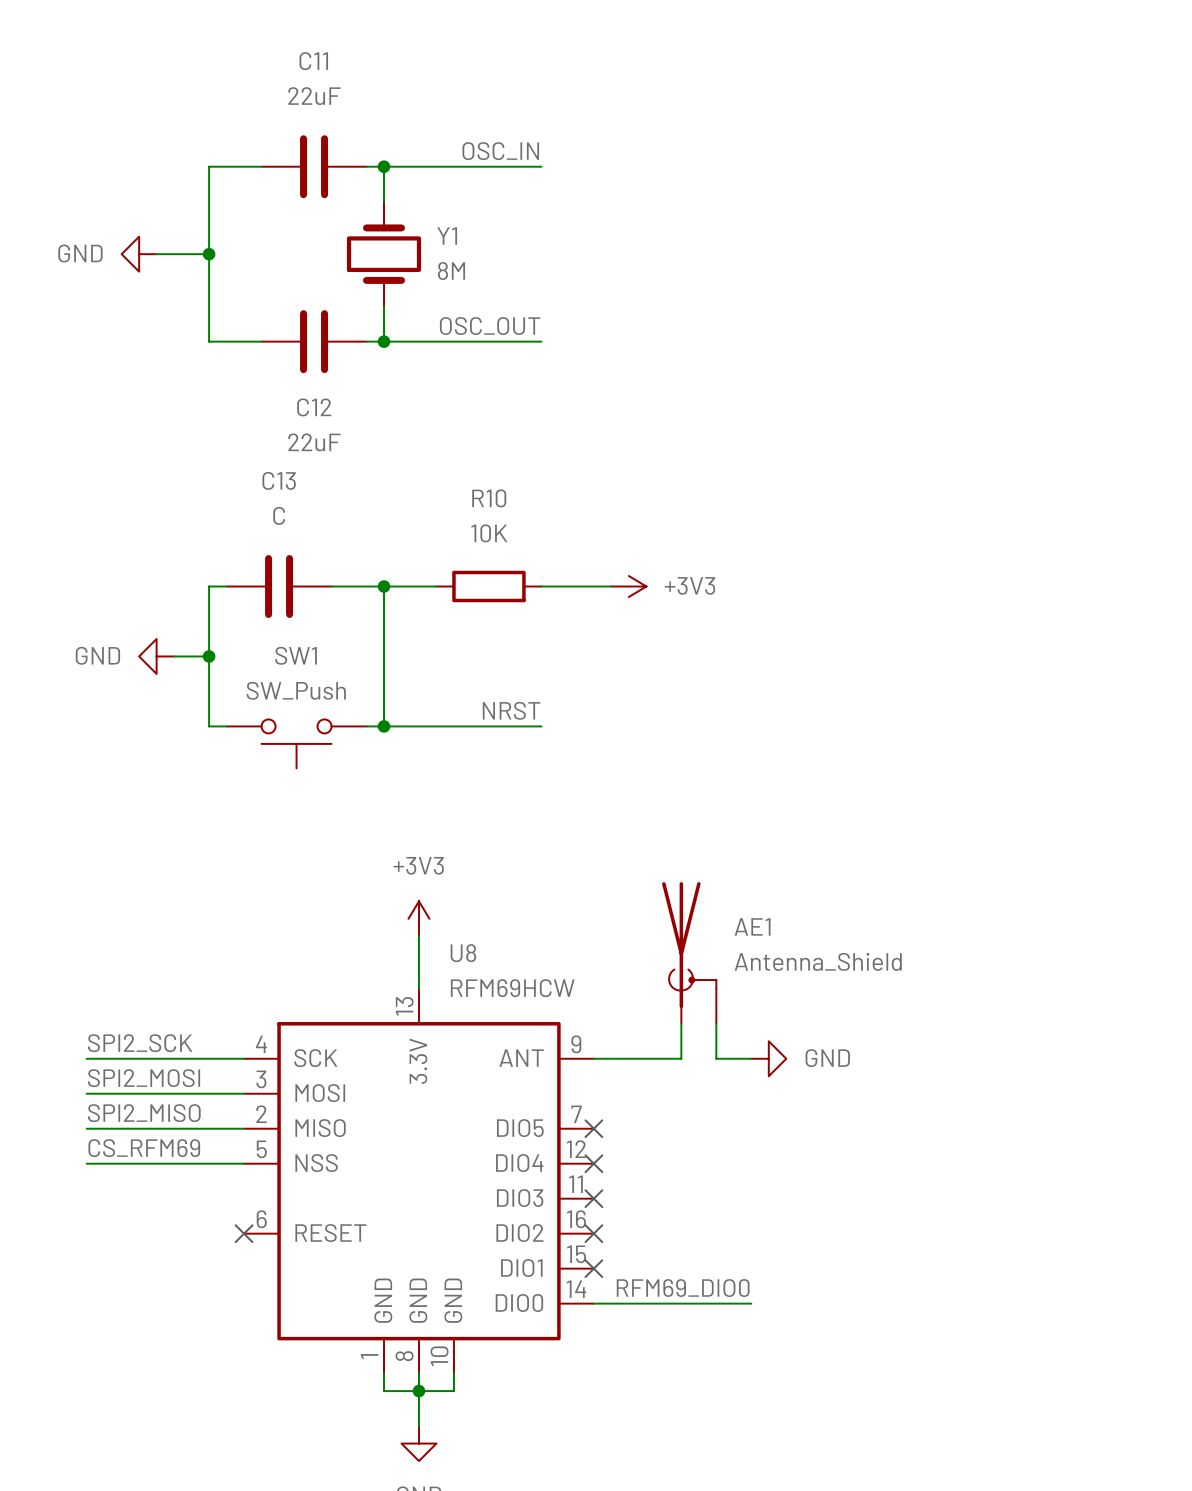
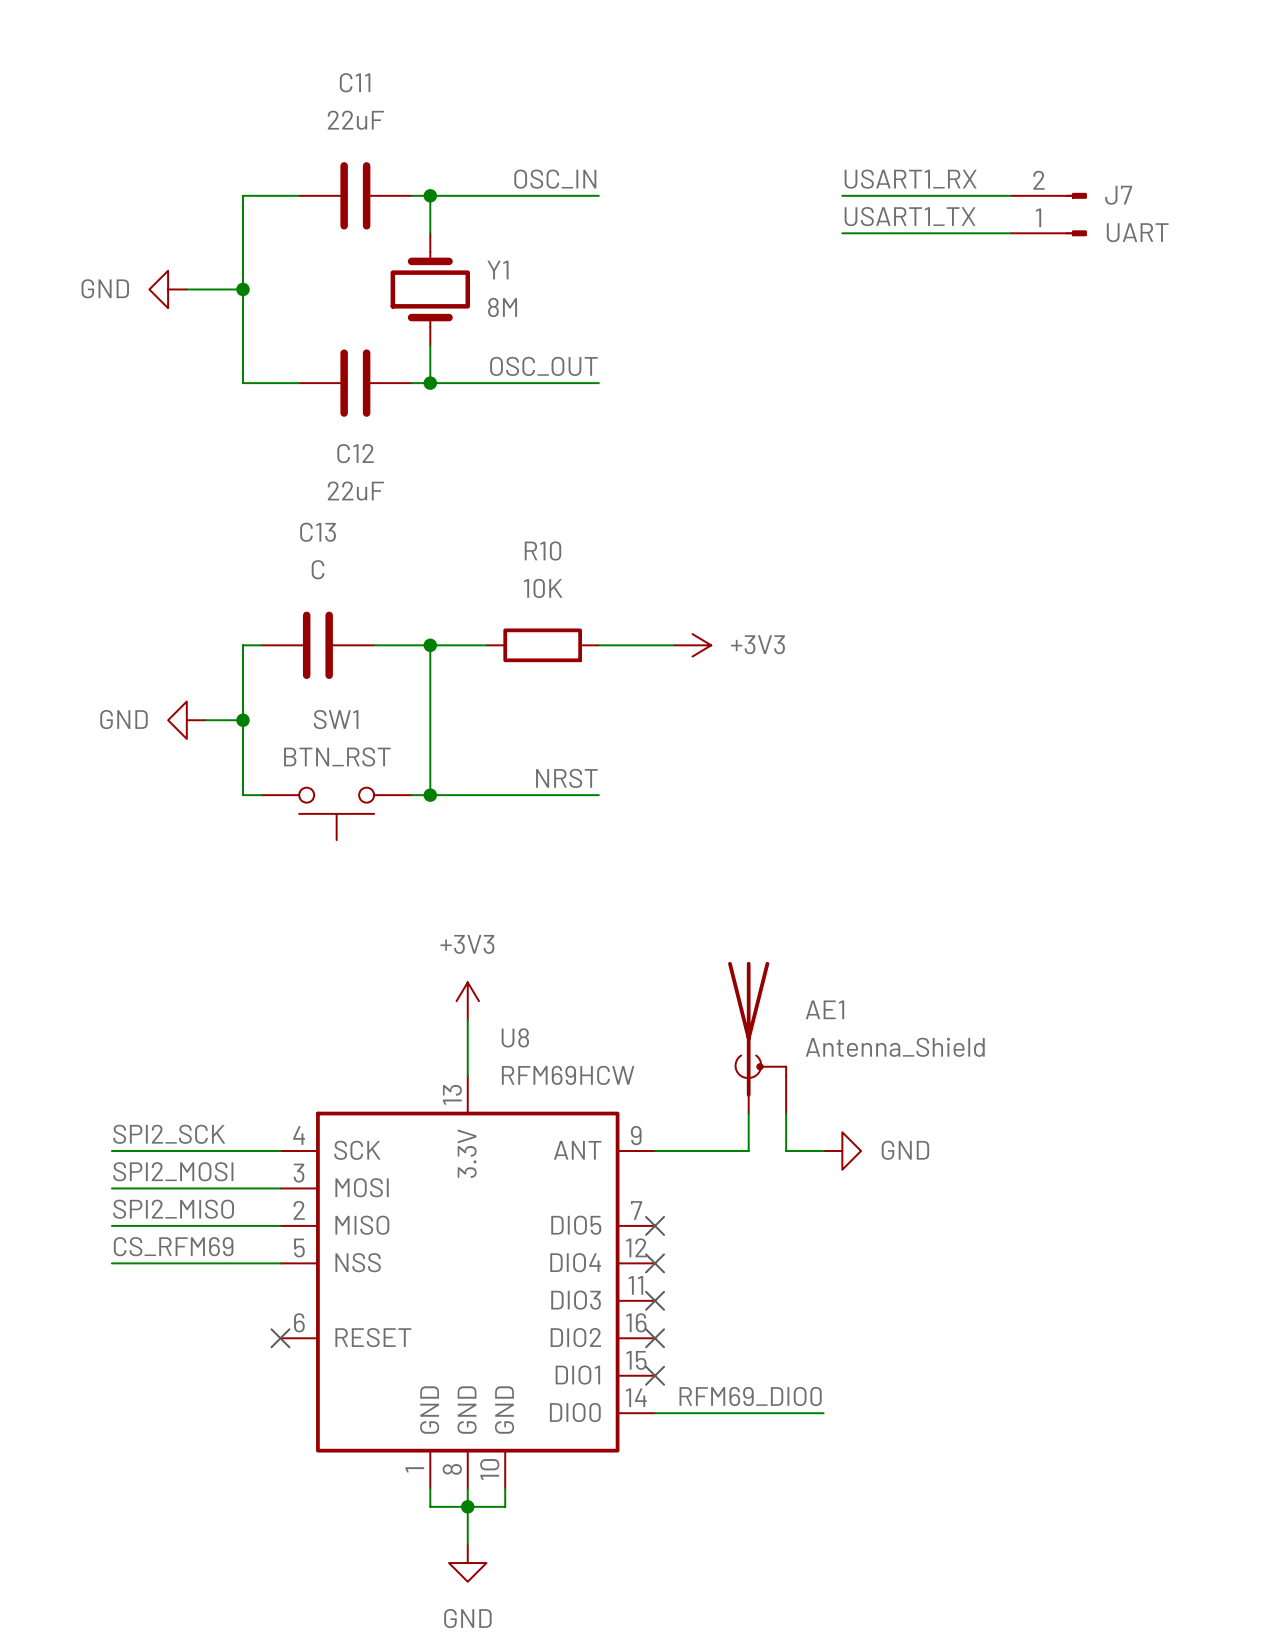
label: none -> USART1_RX (910, 179)
wire: none -> (842, 195) (1010, 195)
J7: none -> UART (1048, 214)
label: none -> USART1_TX (910, 216)
wire: none -> (842, 233) (1010, 233)
SW1 value: SW_Push (296, 690) -> BTN_RST (337, 756)

